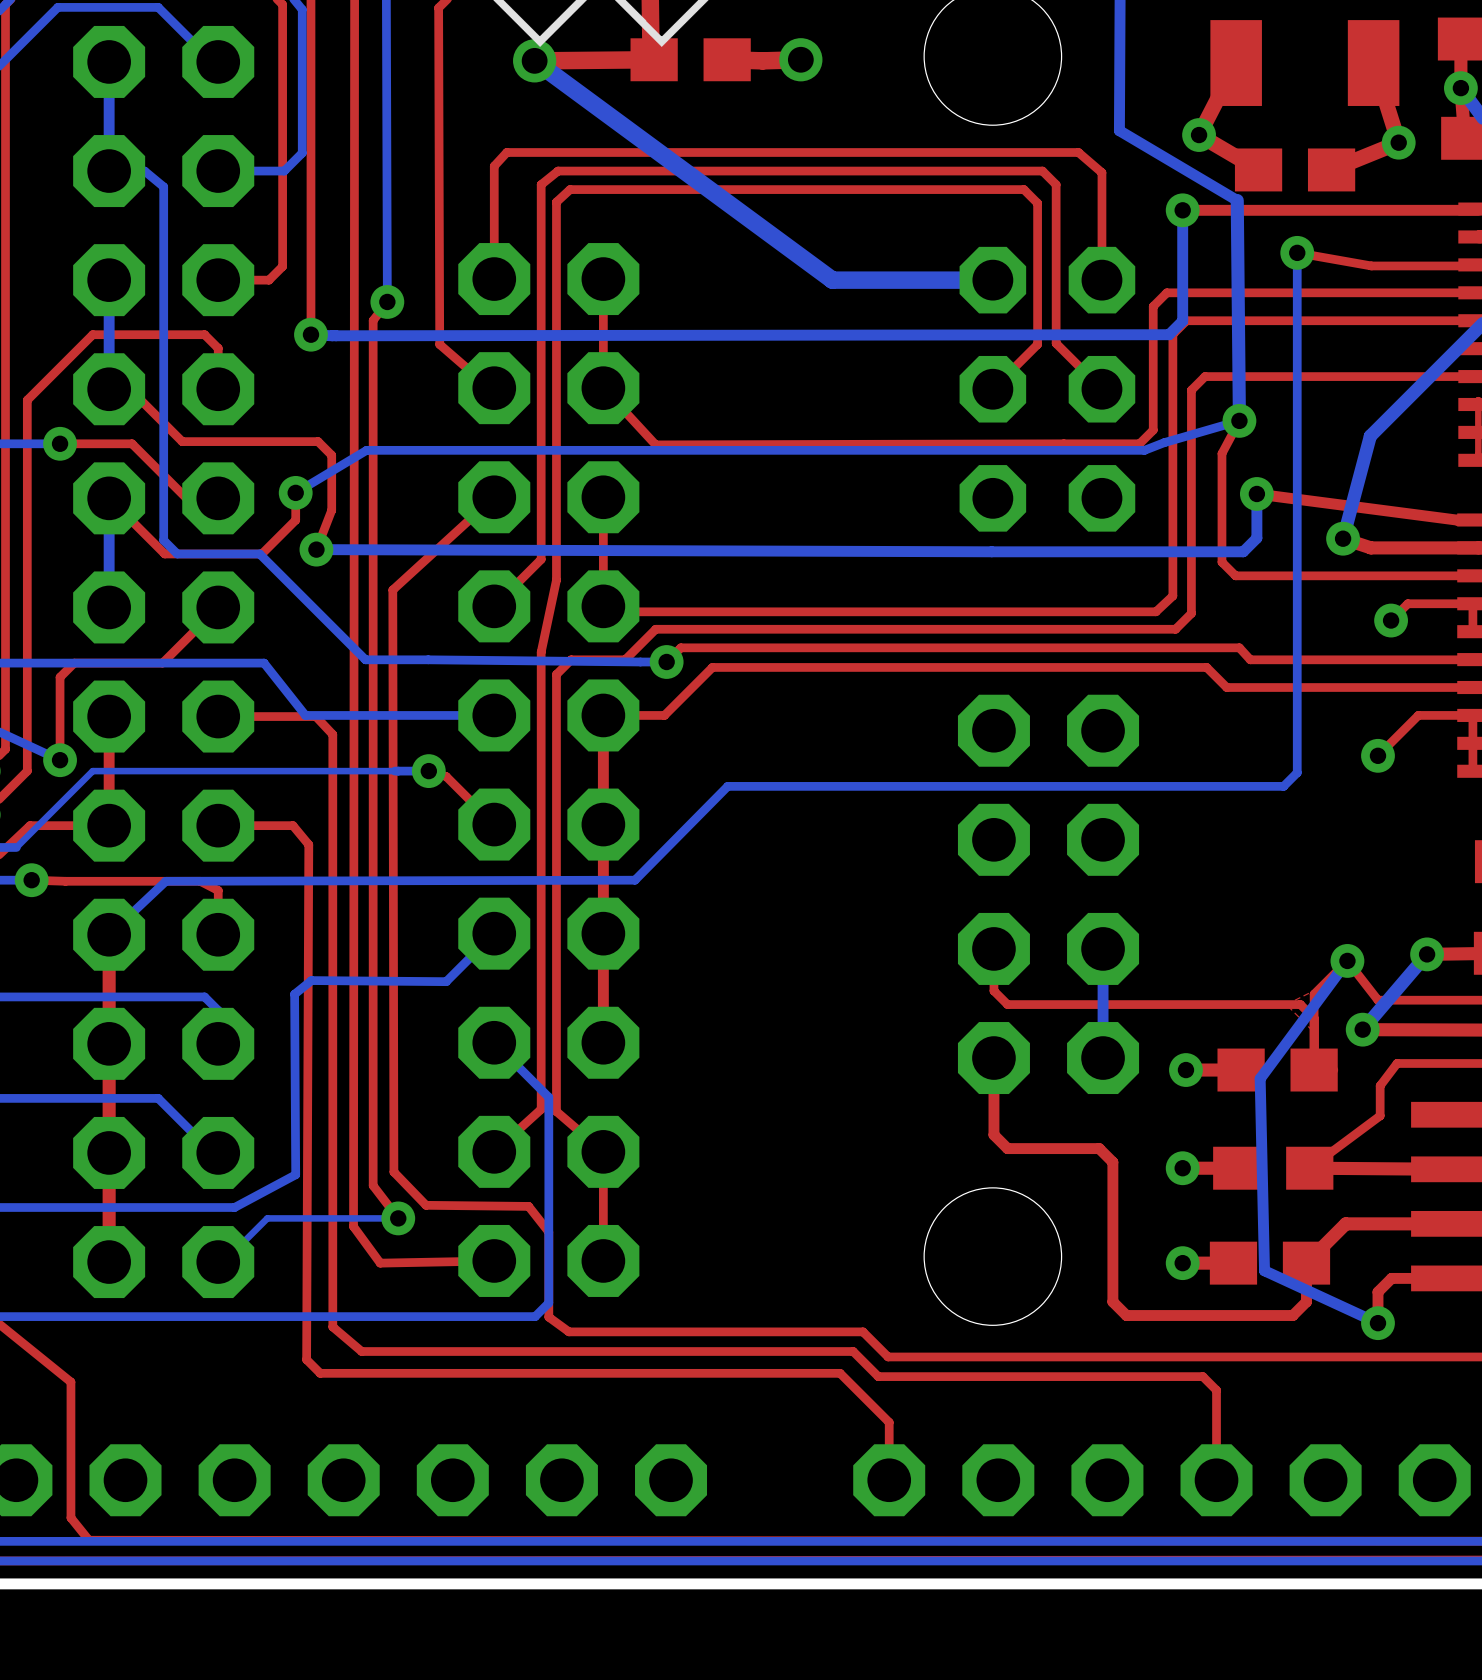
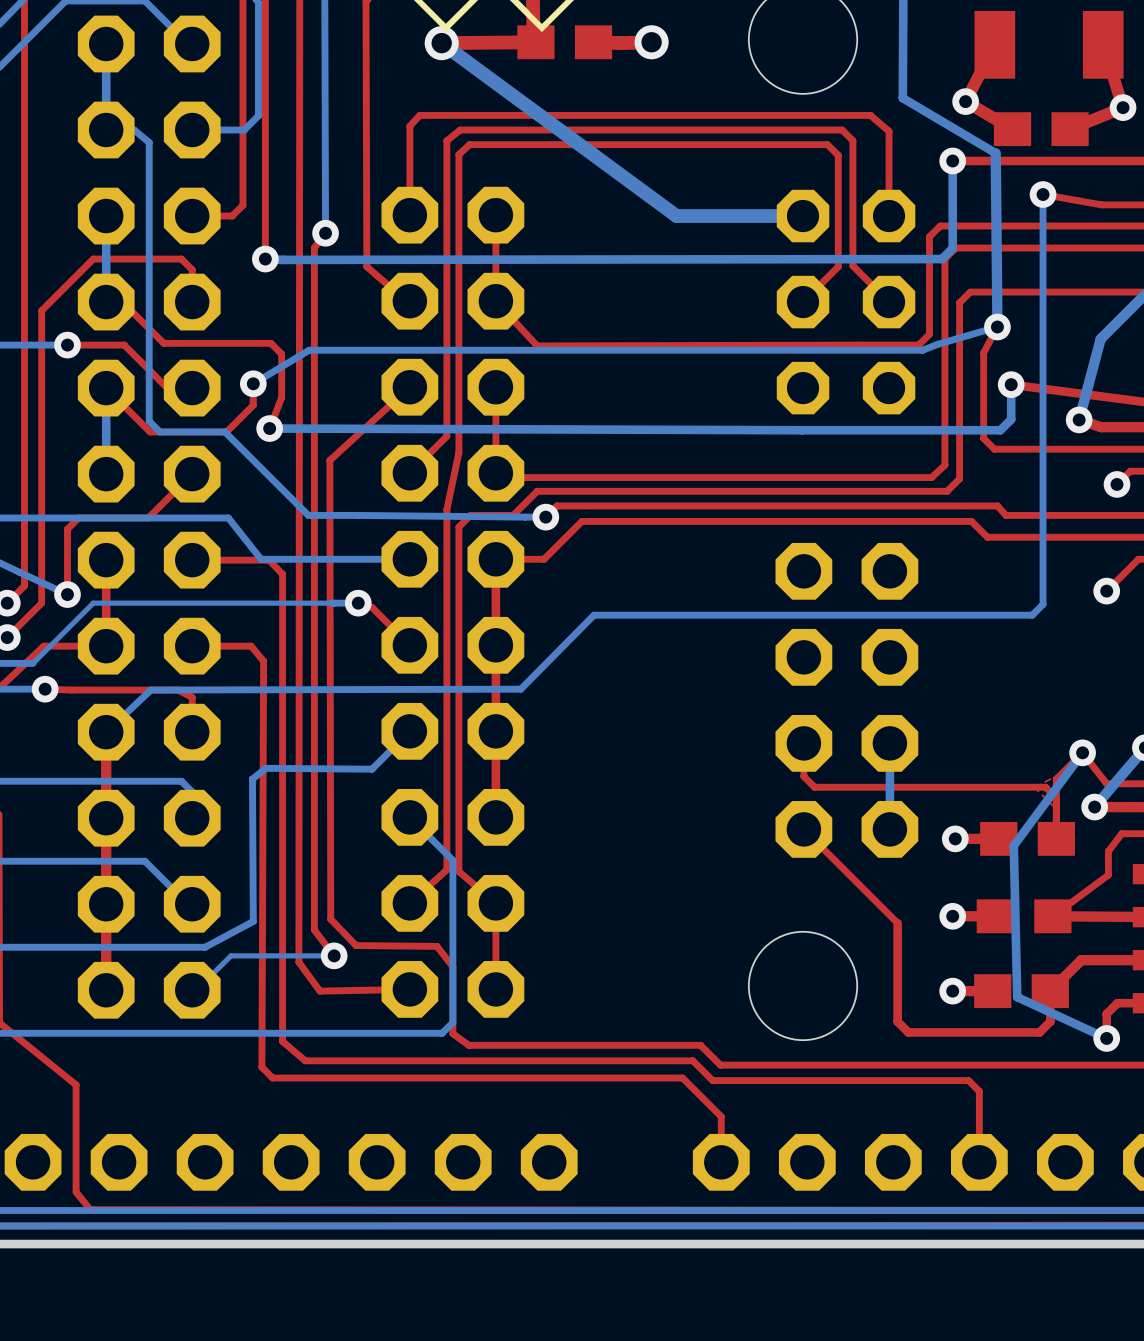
top track: (993, 1058) (993, 1134) (1007, 1148) (1099, 1148) (1112, 1162) (1112, 1176) -> (803, 829) (897, 923)

